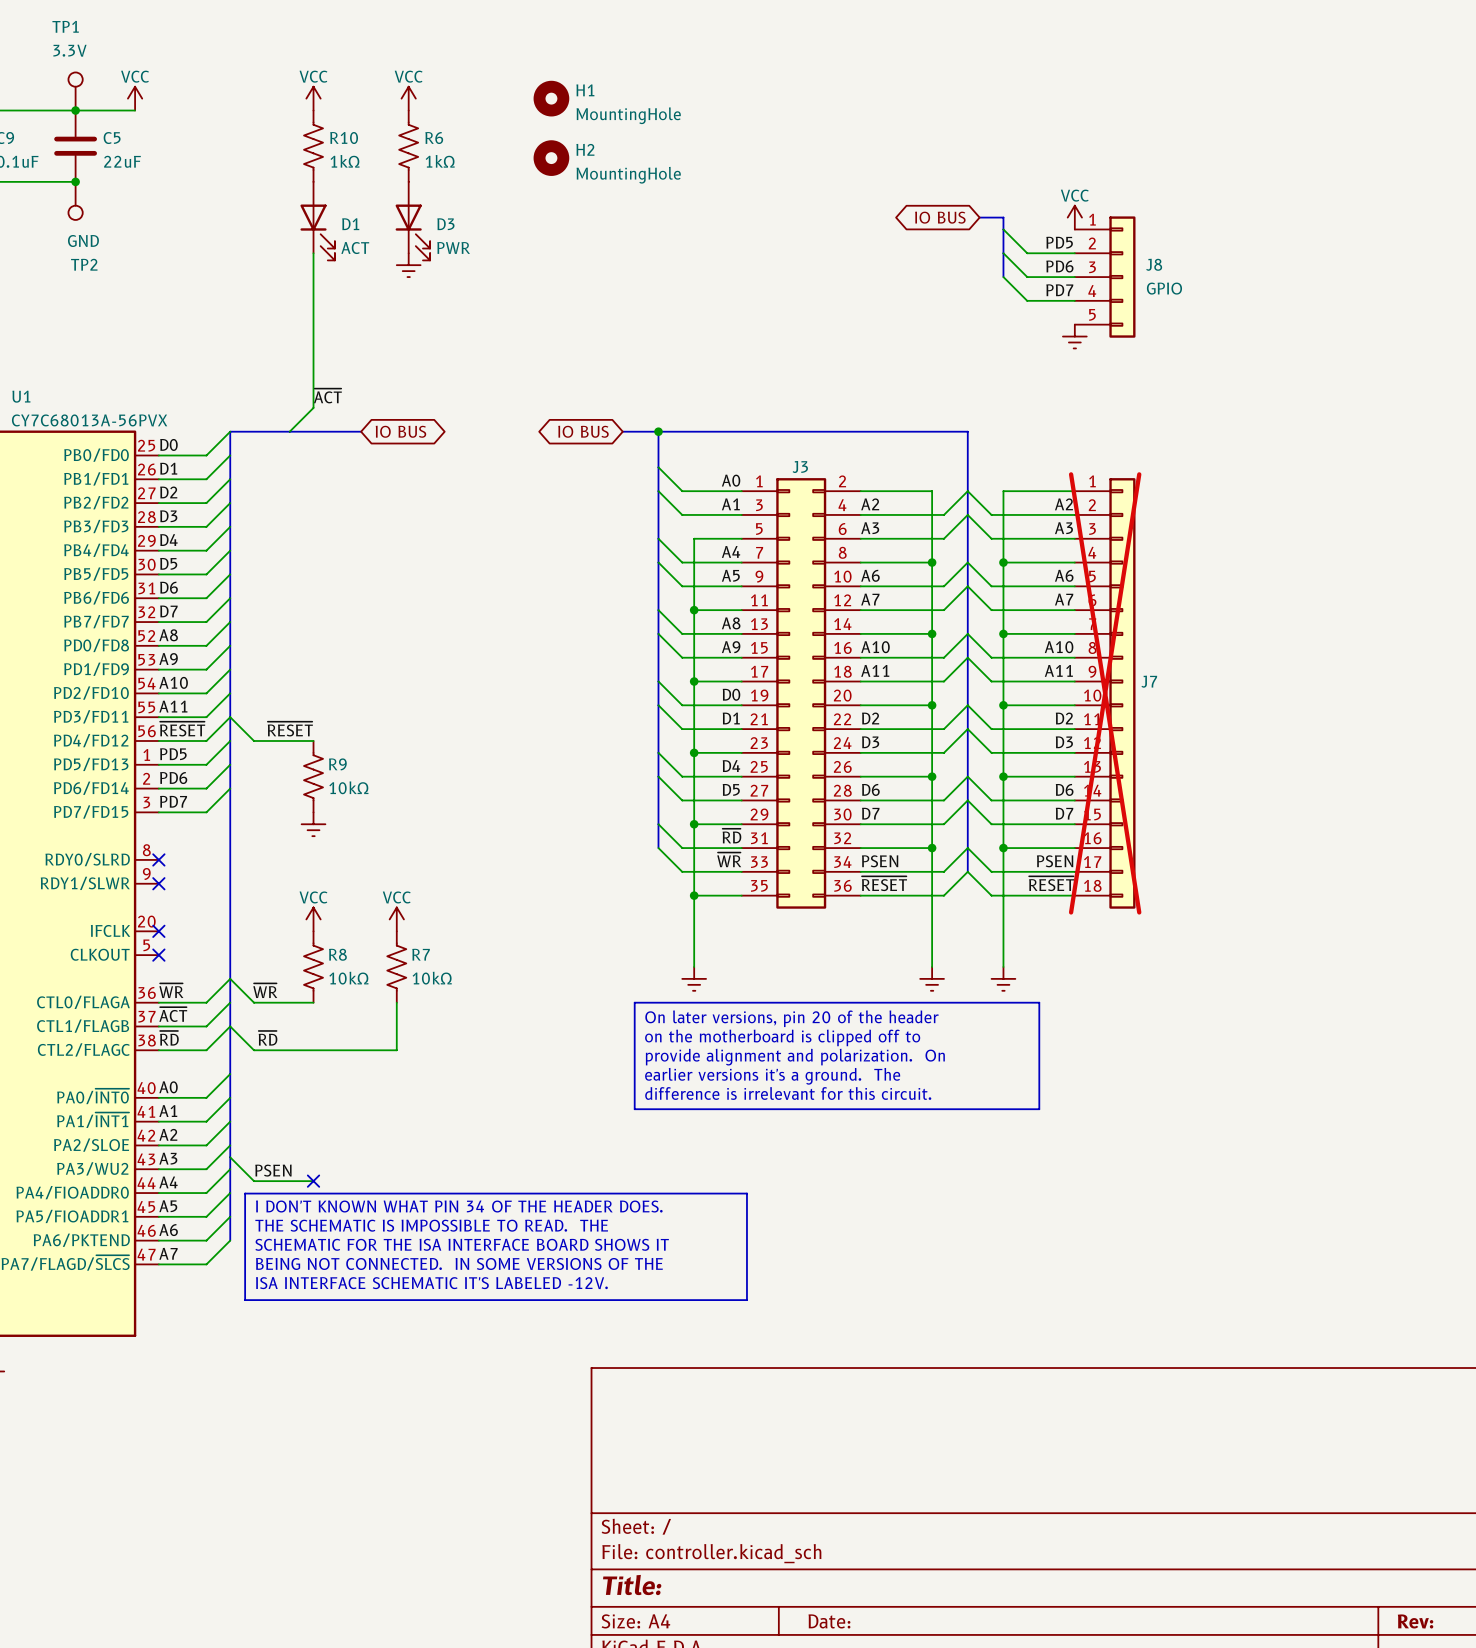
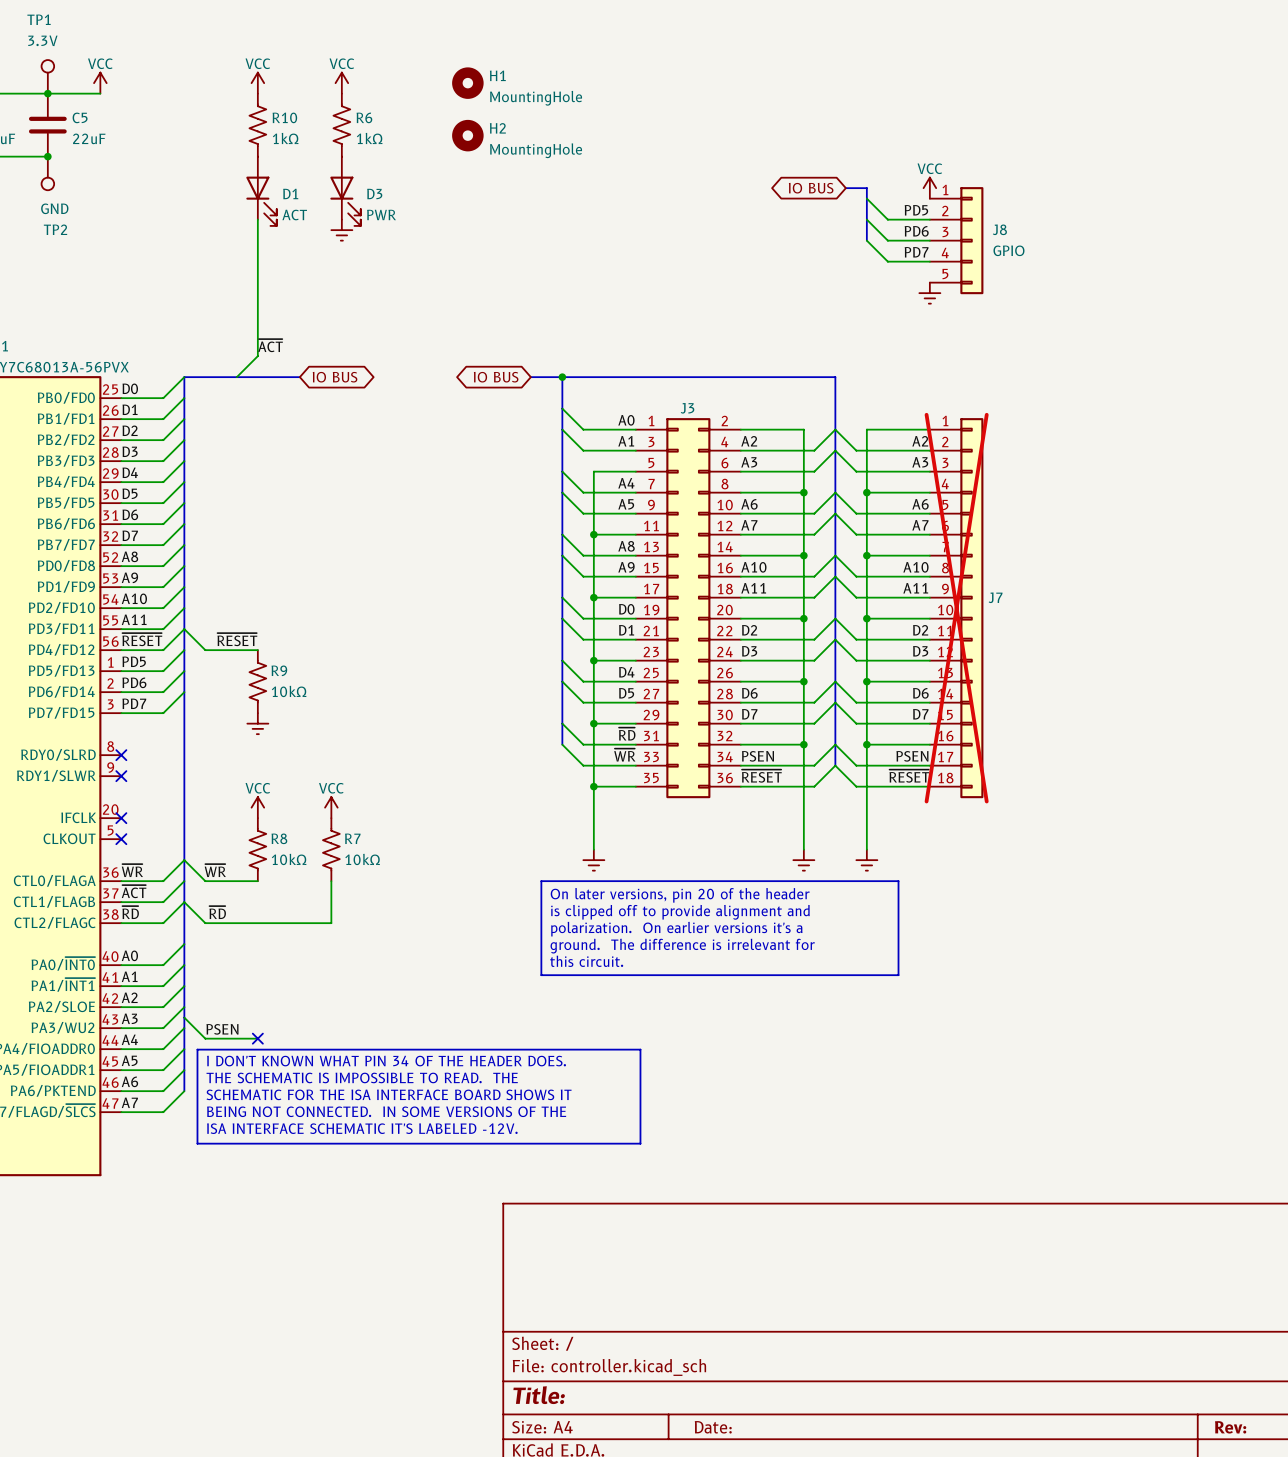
text: on the motherboard is clipped off to (782, 1037) -> is clipped off to provide alignment and (680, 912)
text: provide alignment and polarization. On (795, 1057) -> polarization. On earlier versions it's a (676, 929)
text: earlier versions it's a ground. The (772, 1076) -> ground. The difference is irrelevant for (682, 946)
text: difference is irrelevant for this circuit. (788, 1093) -> this circuit. (586, 961)

